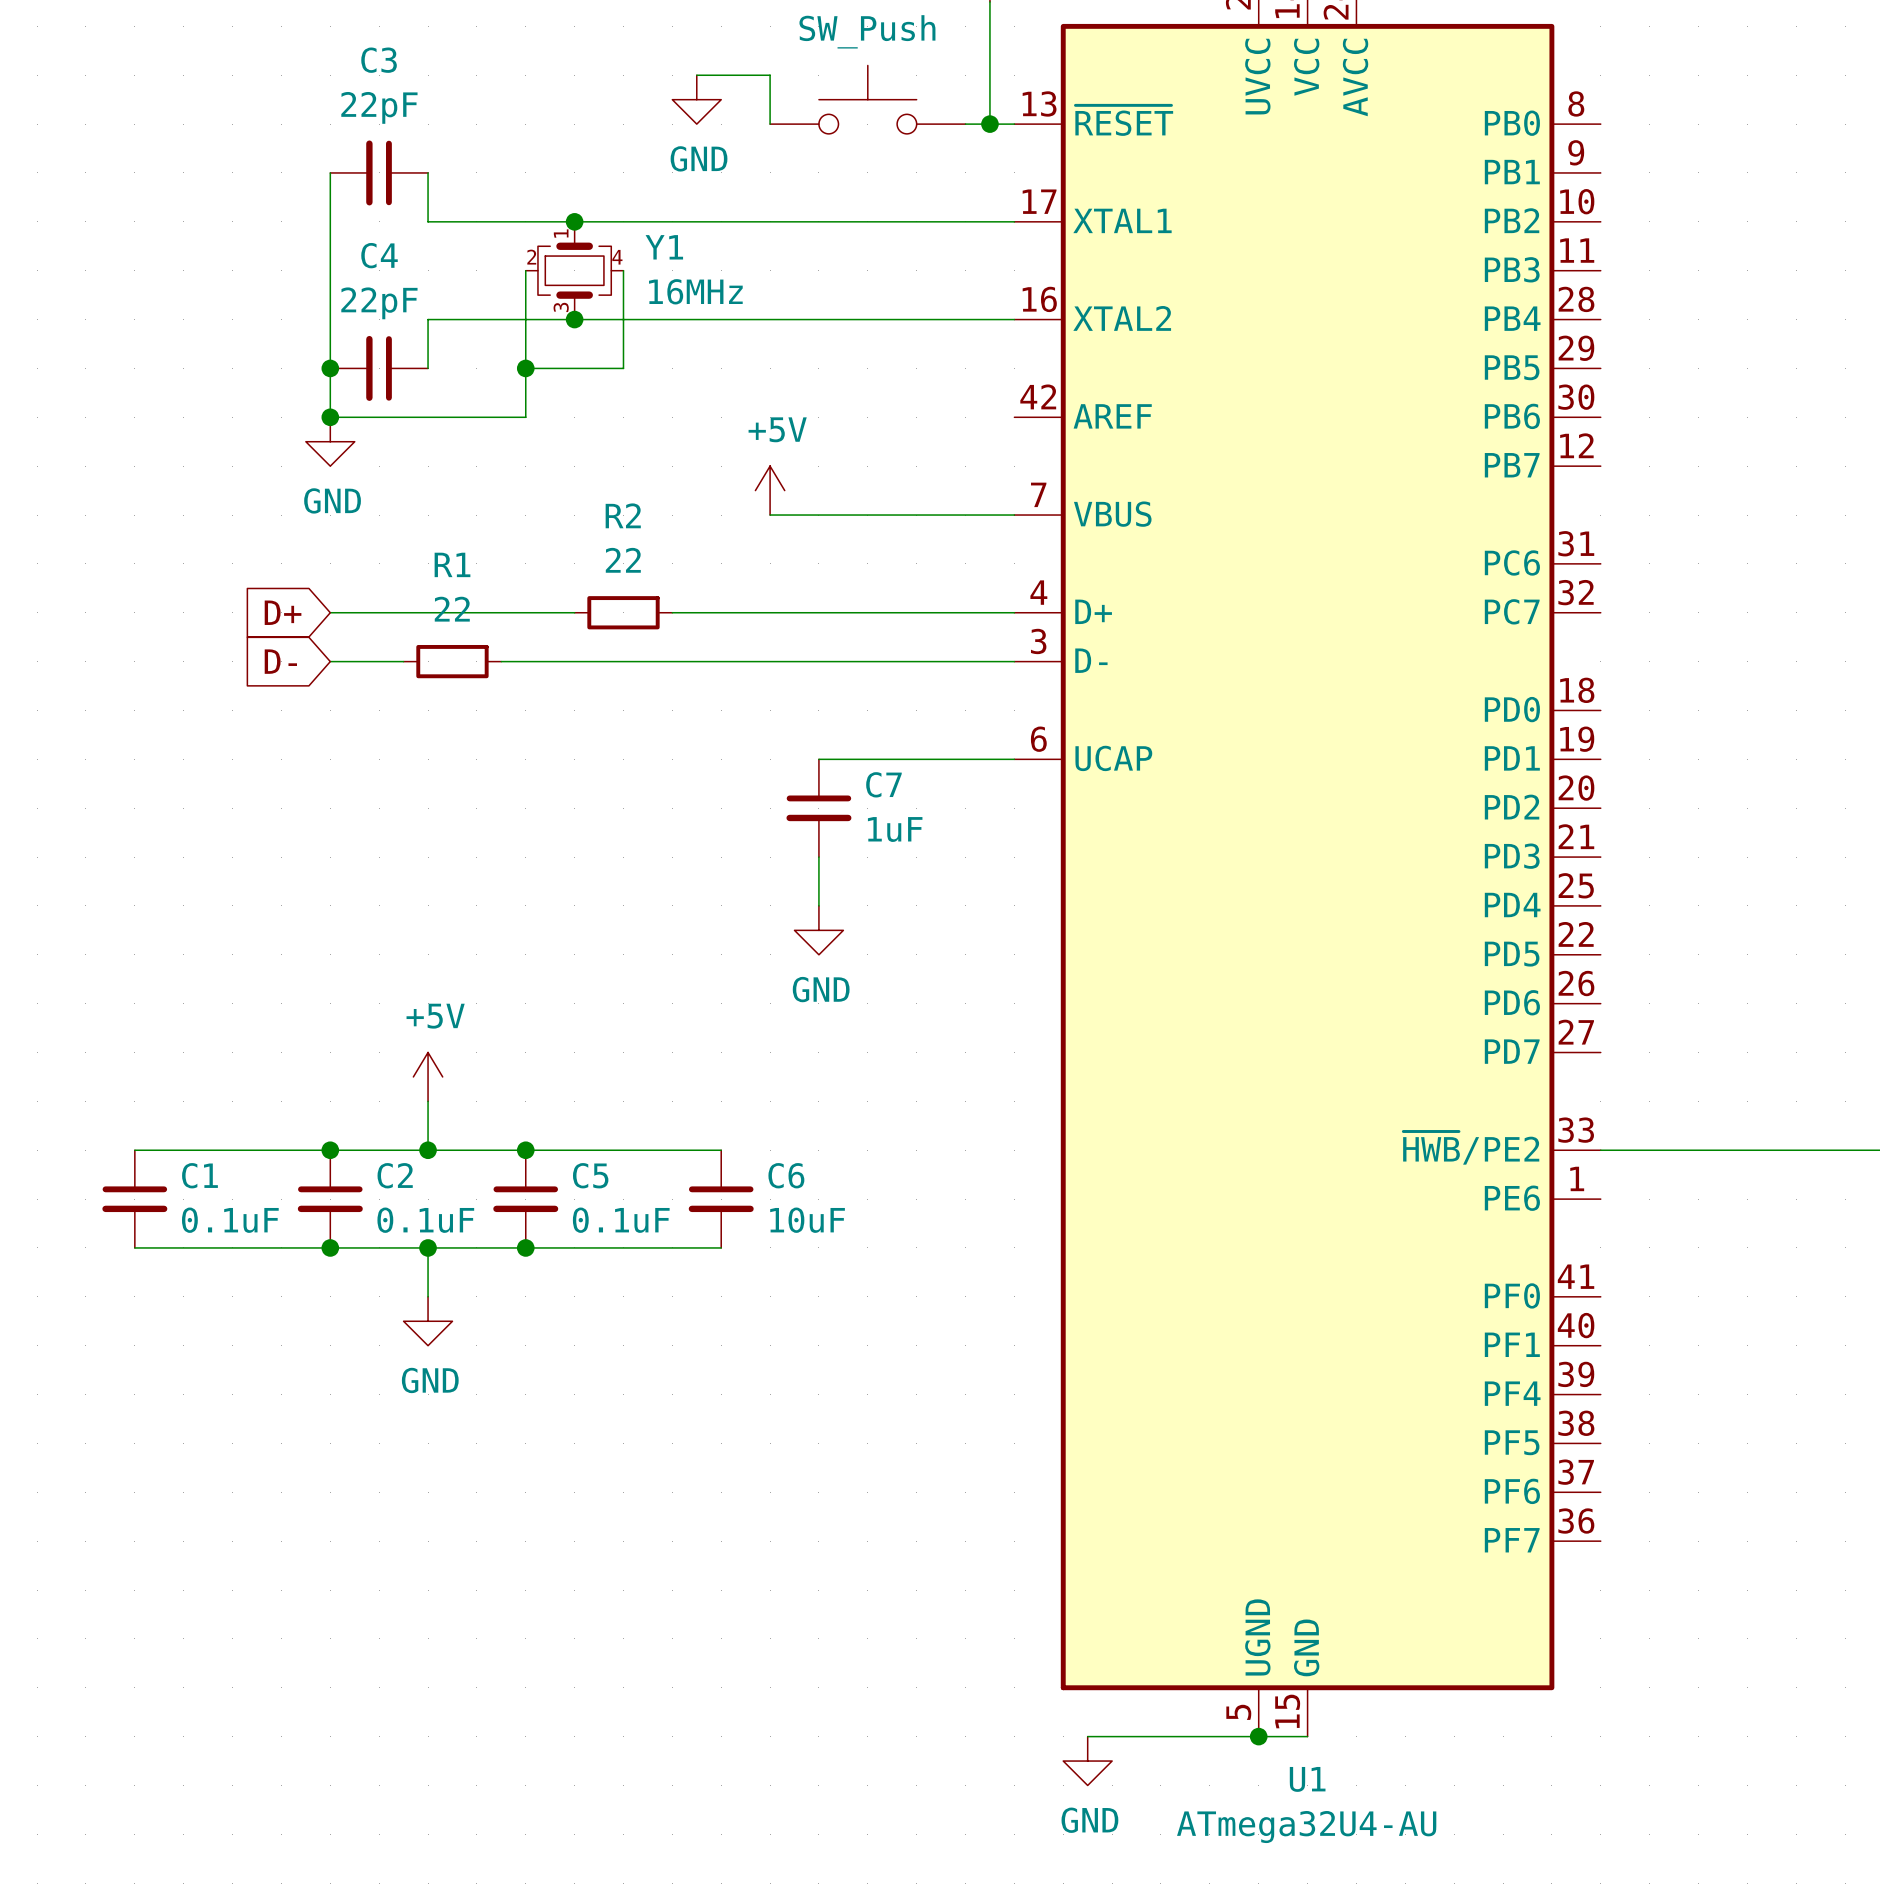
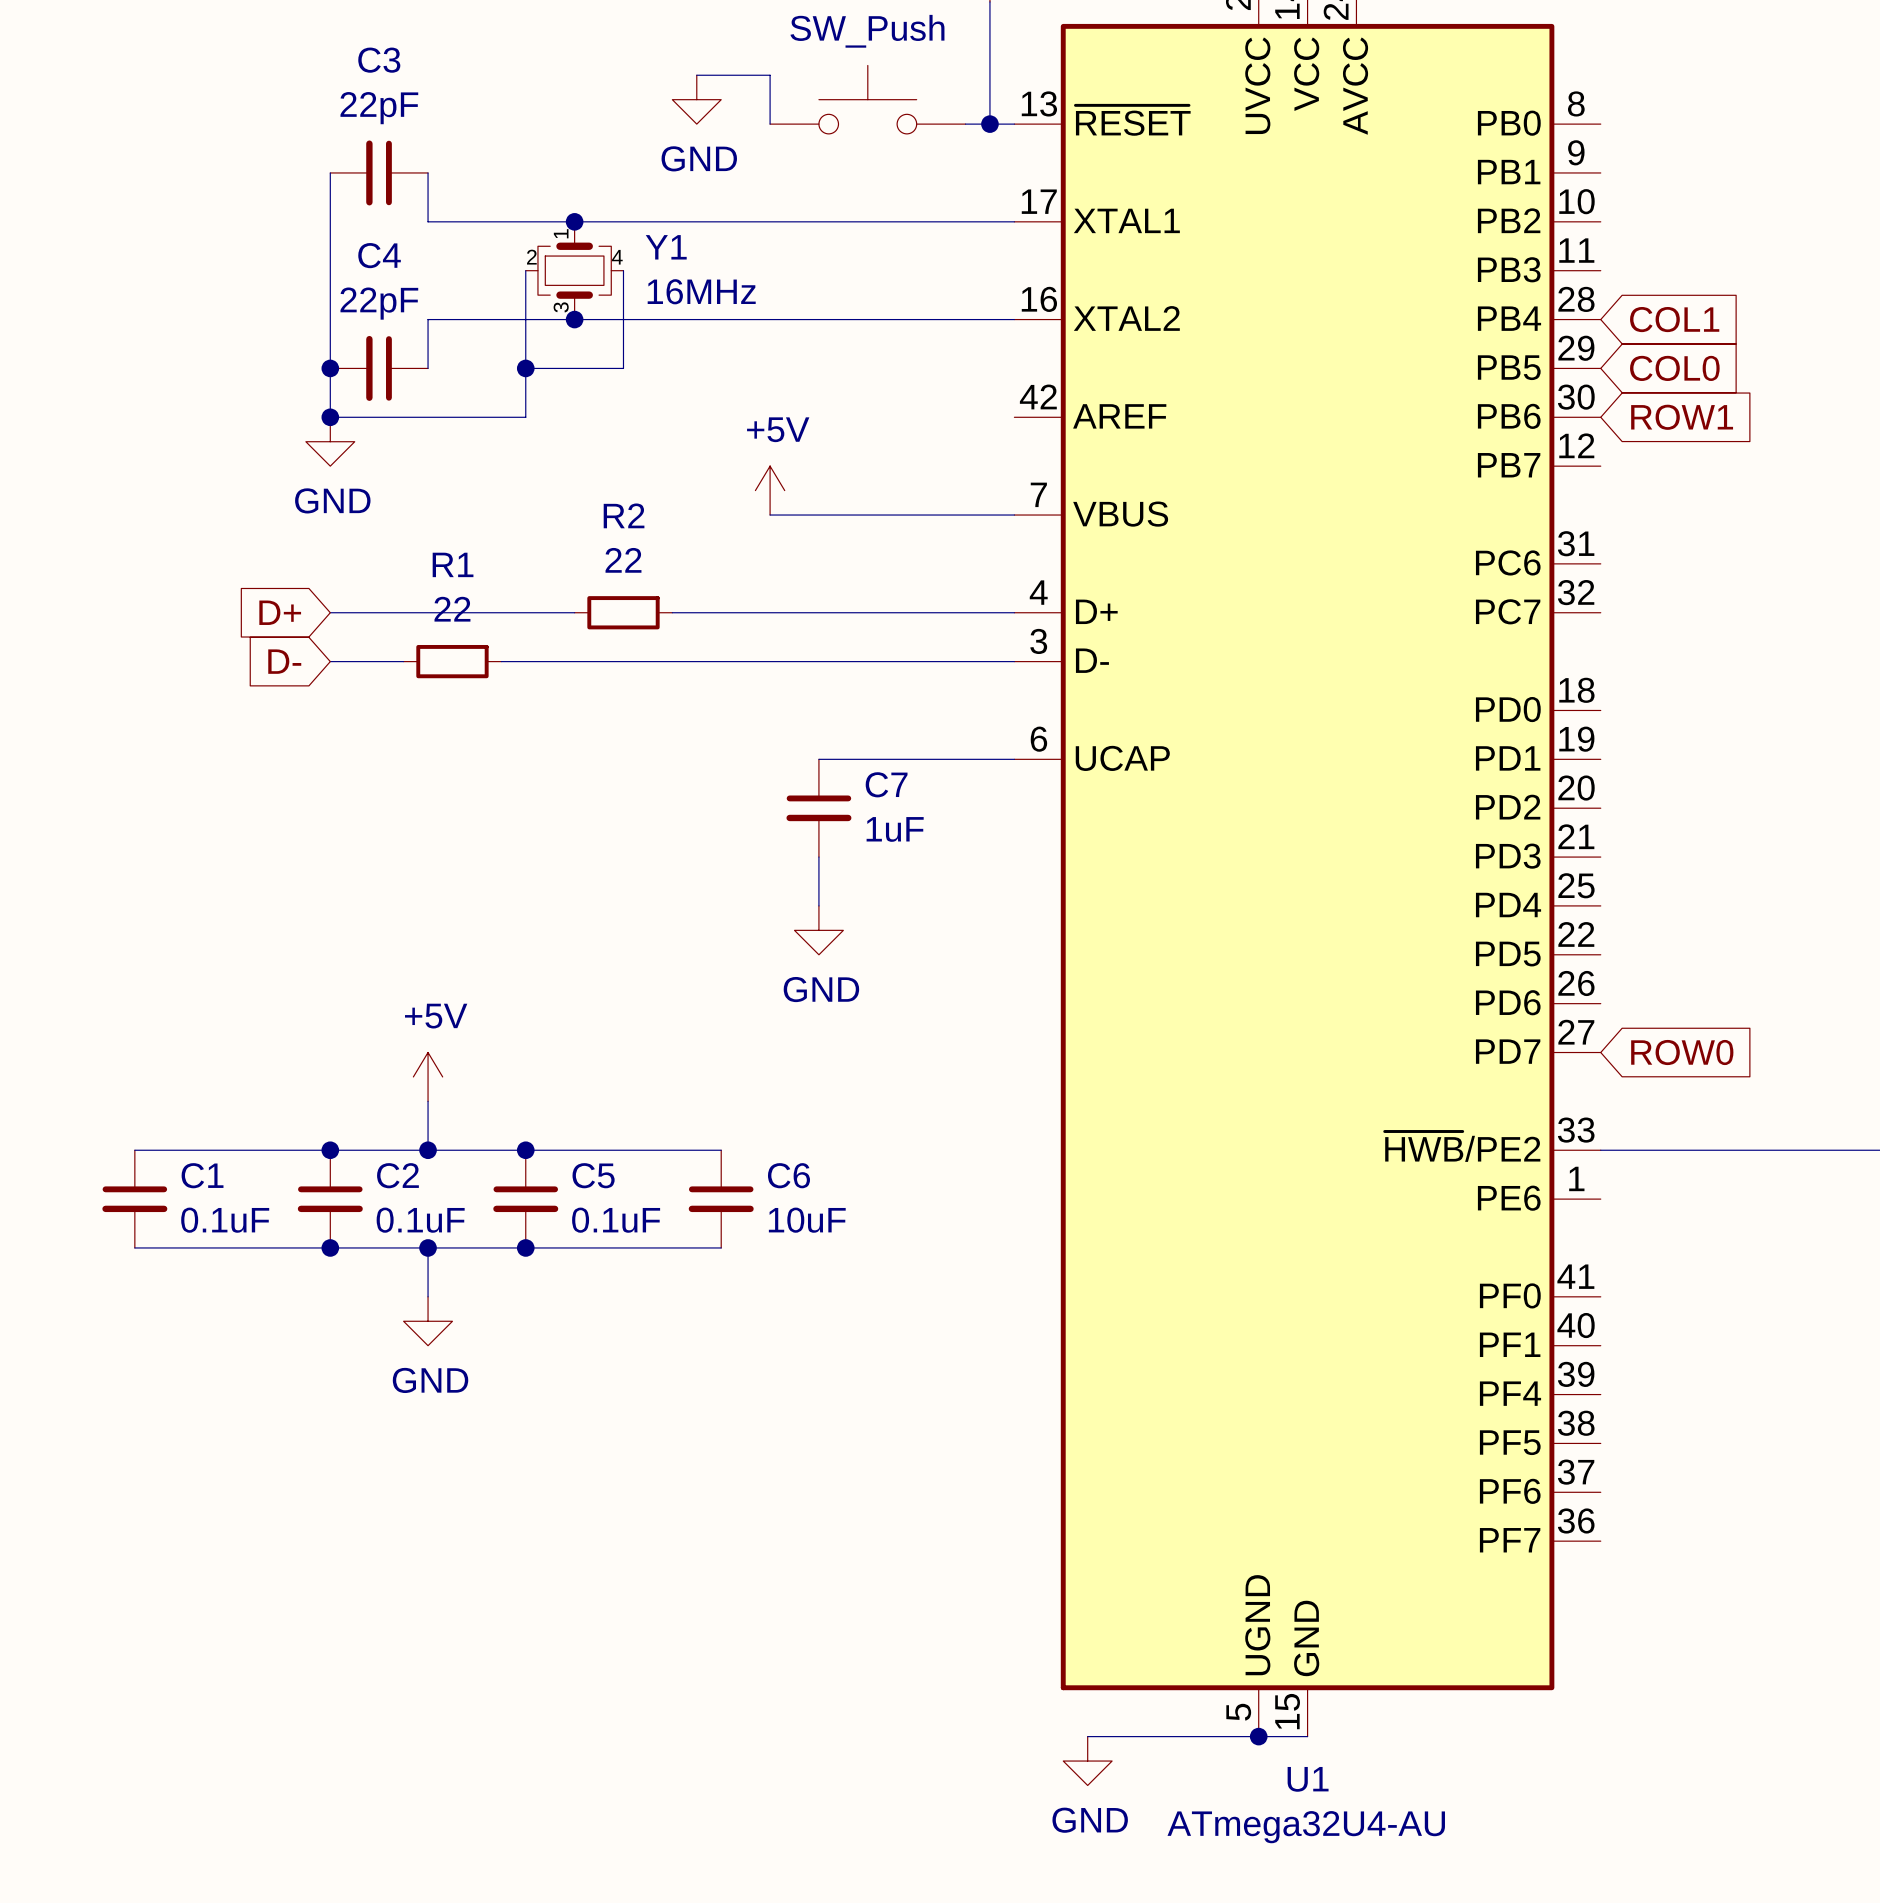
global label: none -> COL1 (1674, 319)
global label: none -> COL0 (1674, 368)
global label: none -> ROW1 (1682, 417)
global label: none -> ROW0 (1682, 1052)

